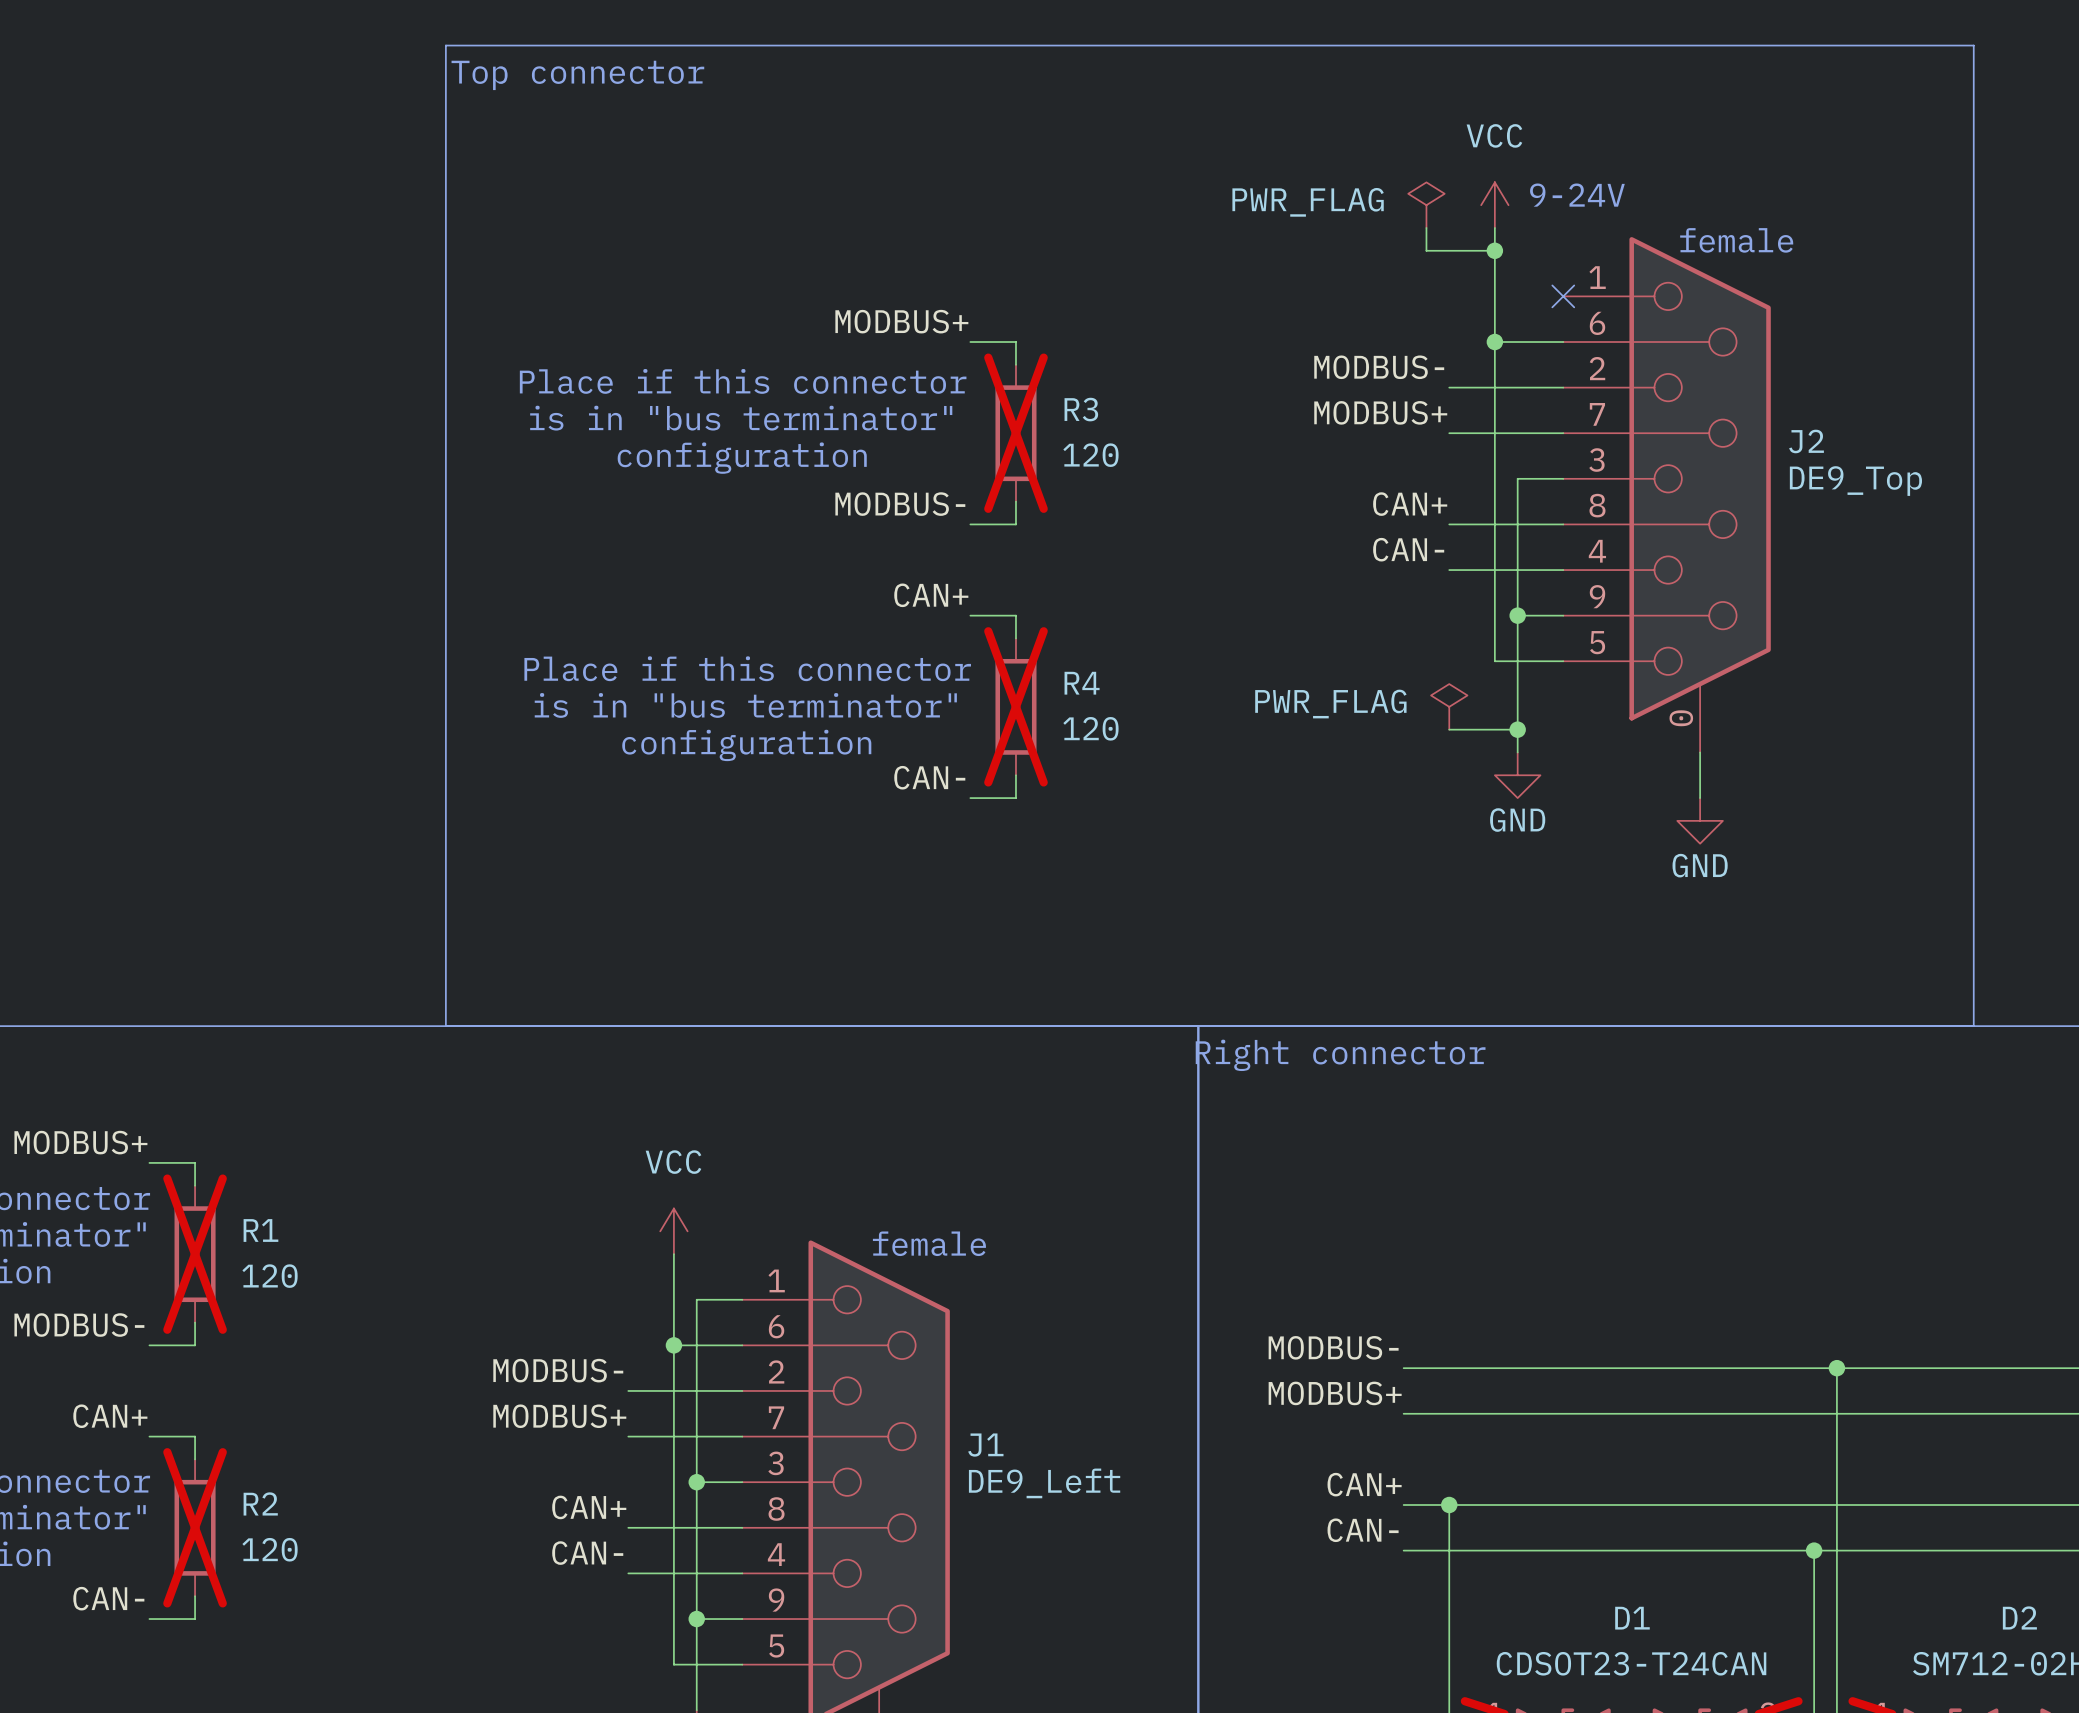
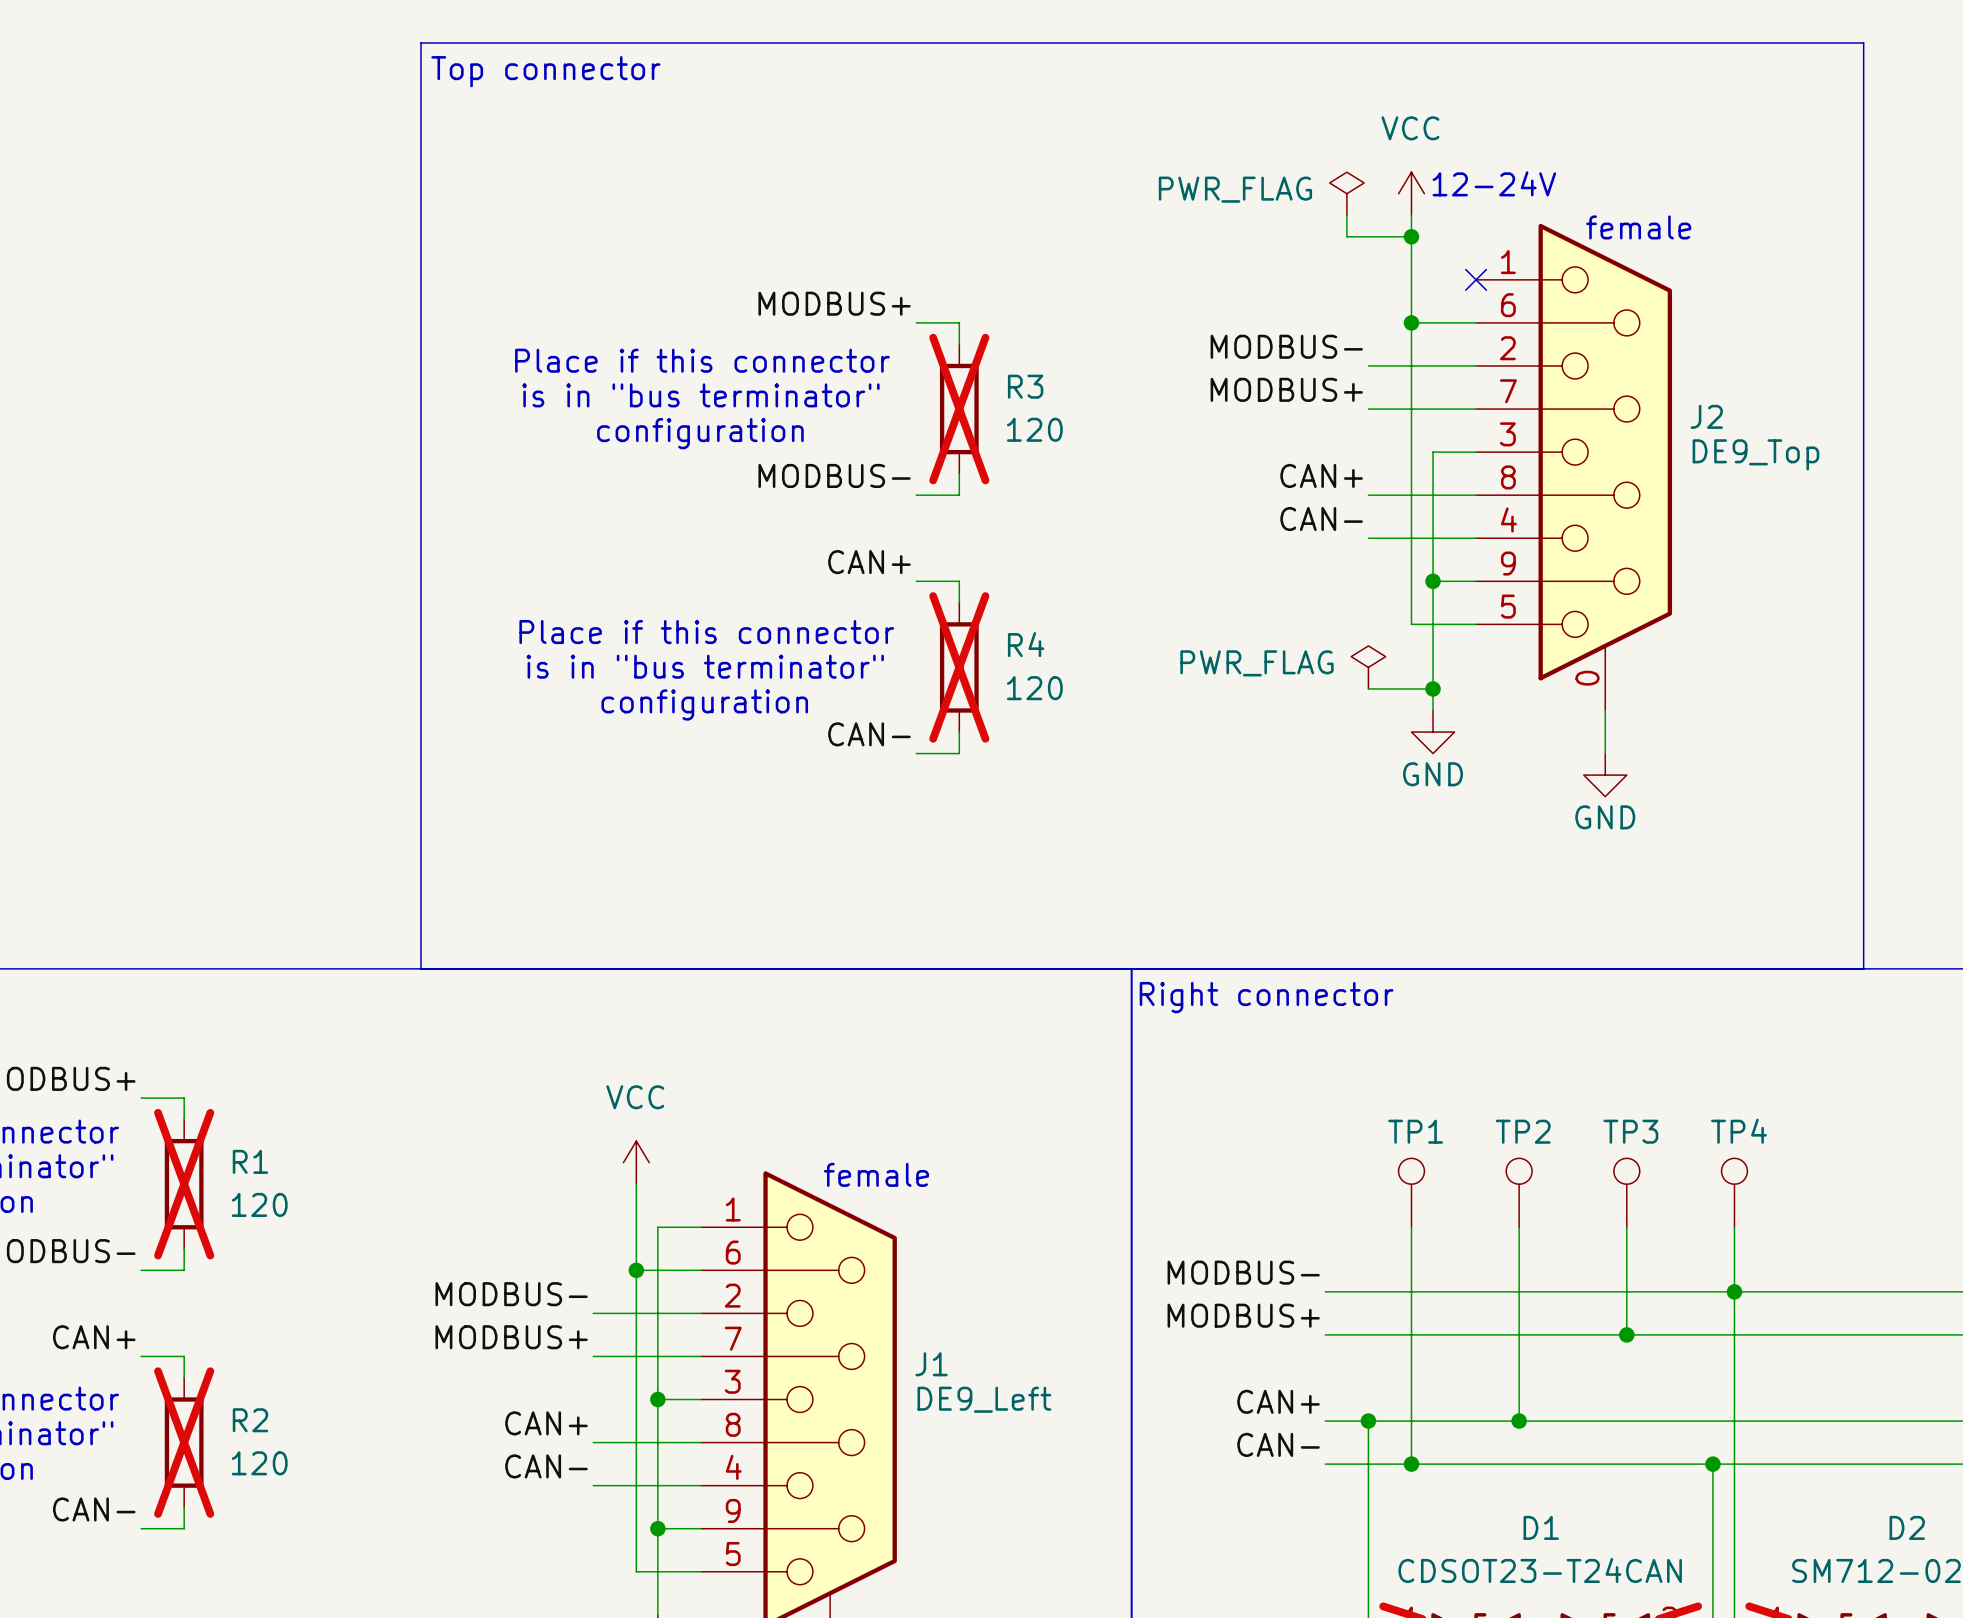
text: 9-24V (1577, 195) -> 12-24V (1494, 183)
TP1: none -> (1411, 1192)
TP2: none -> (1519, 1192)
TP3: none -> (1626, 1192)
TP4: none -> (1734, 1192)
wire: none -> (1411, 1227) (1411, 1464)
wire: none -> (1519, 1227) (1519, 1421)
wire: none -> (1626, 1227) (1626, 1334)
wire: none -> (1734, 1227) (1734, 1291)
junction: none -> (1626, 1334)
junction: none -> (1519, 1421)
junction: none -> (1411, 1464)

